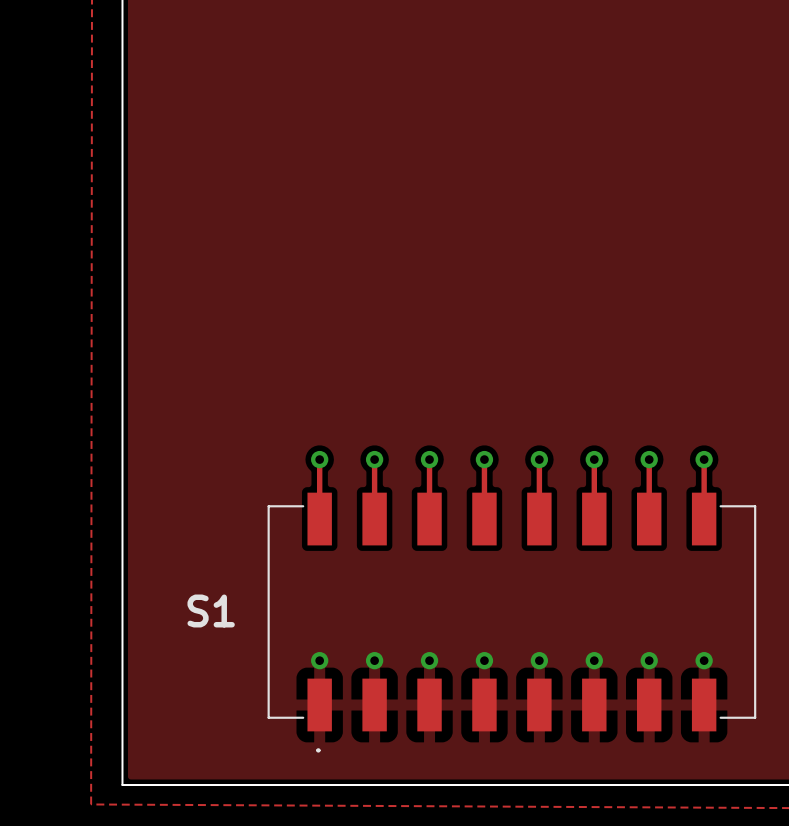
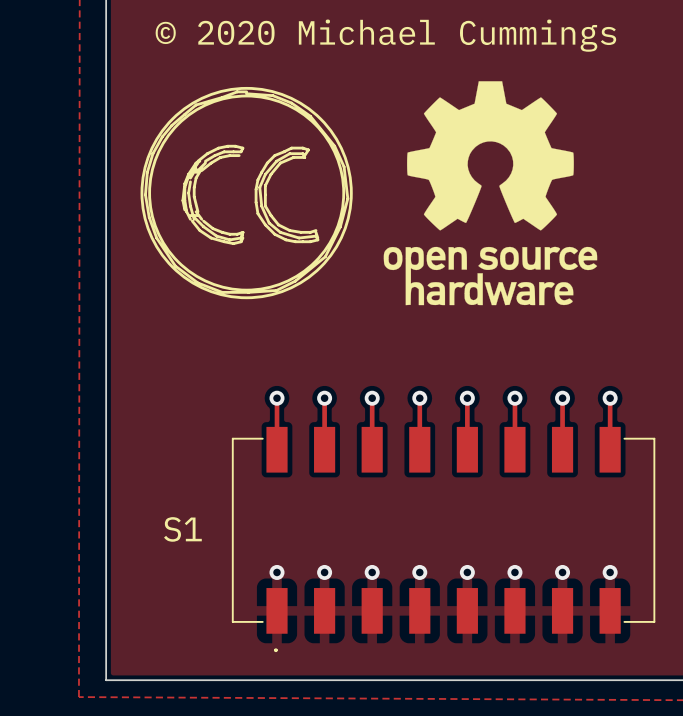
text: none -> © 2020 Michael Cummings (385, 35)
drawing: none -> [383, 81, 598, 306]
drawing: none -> [140, 86, 353, 300]

